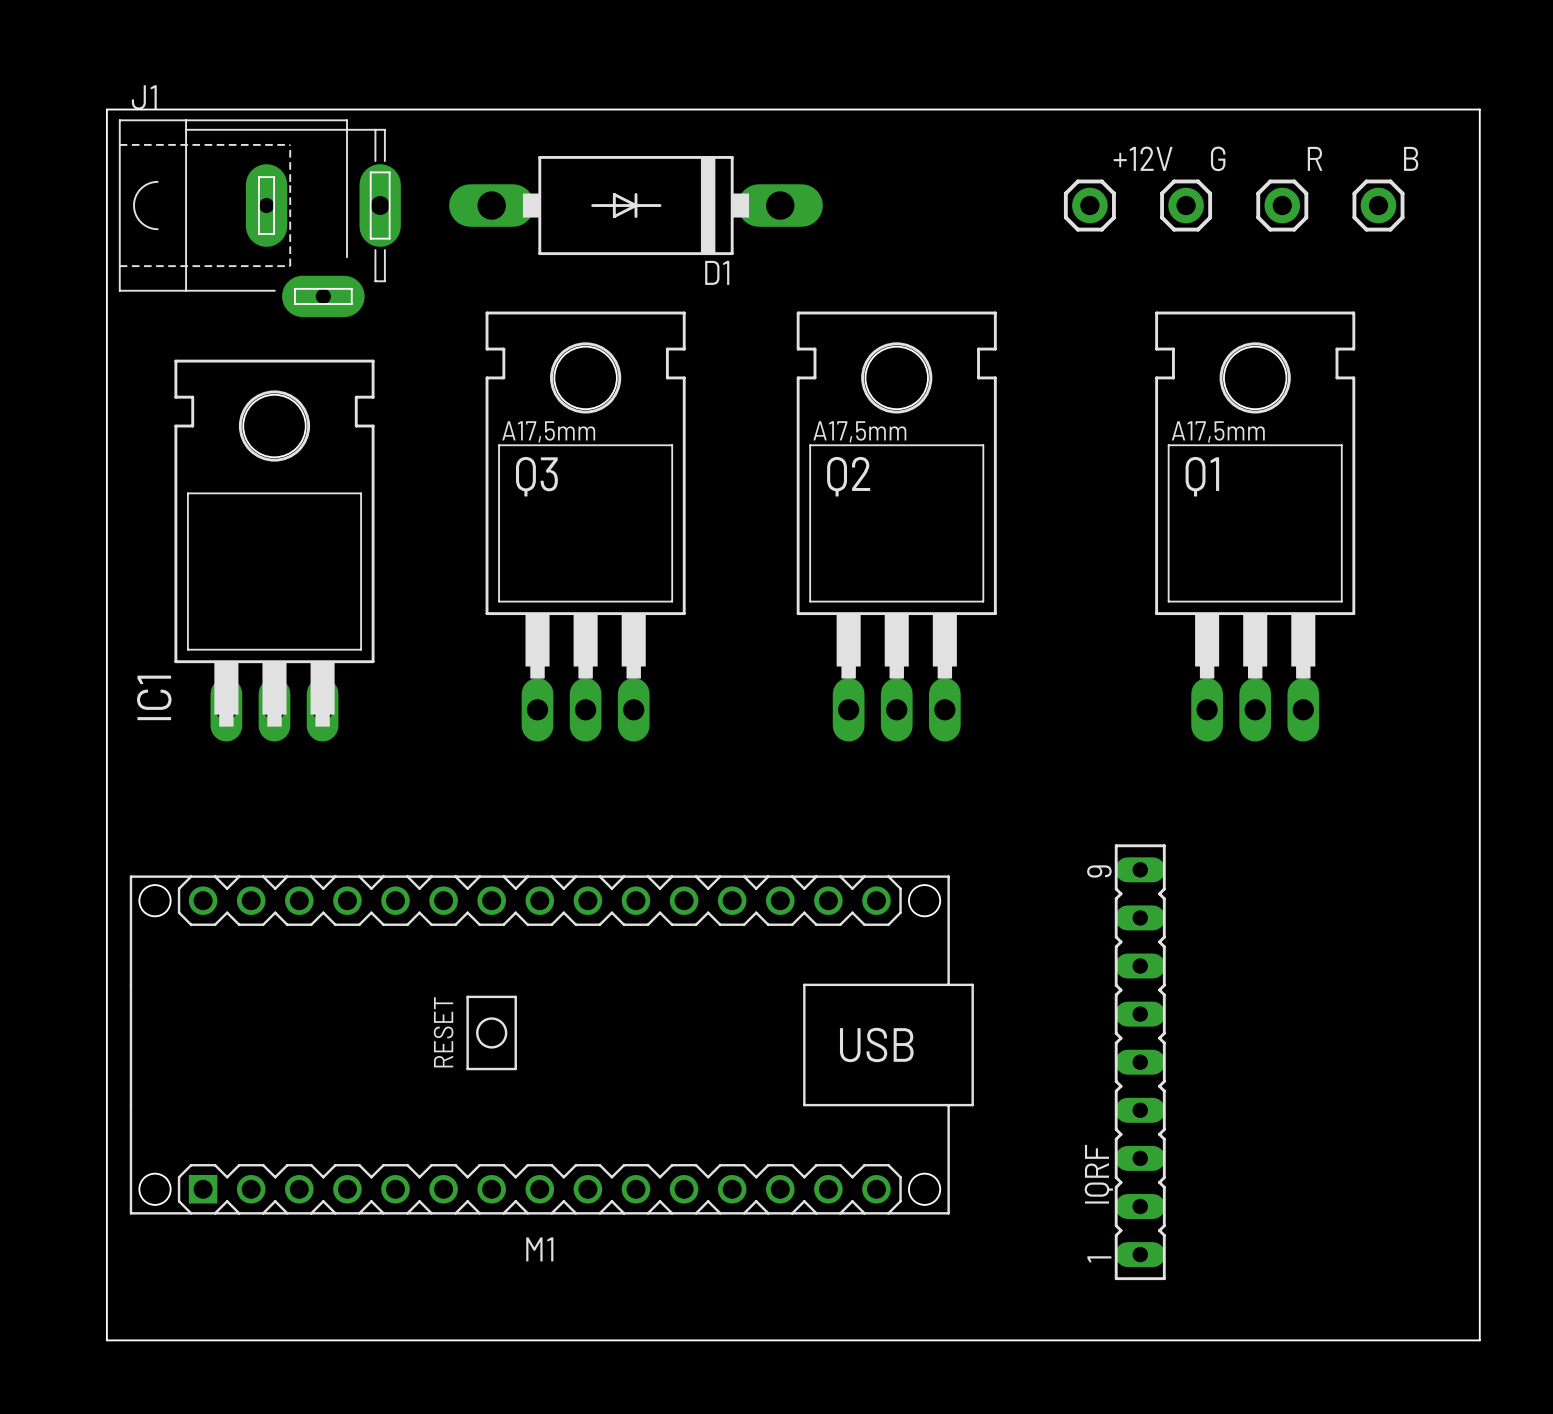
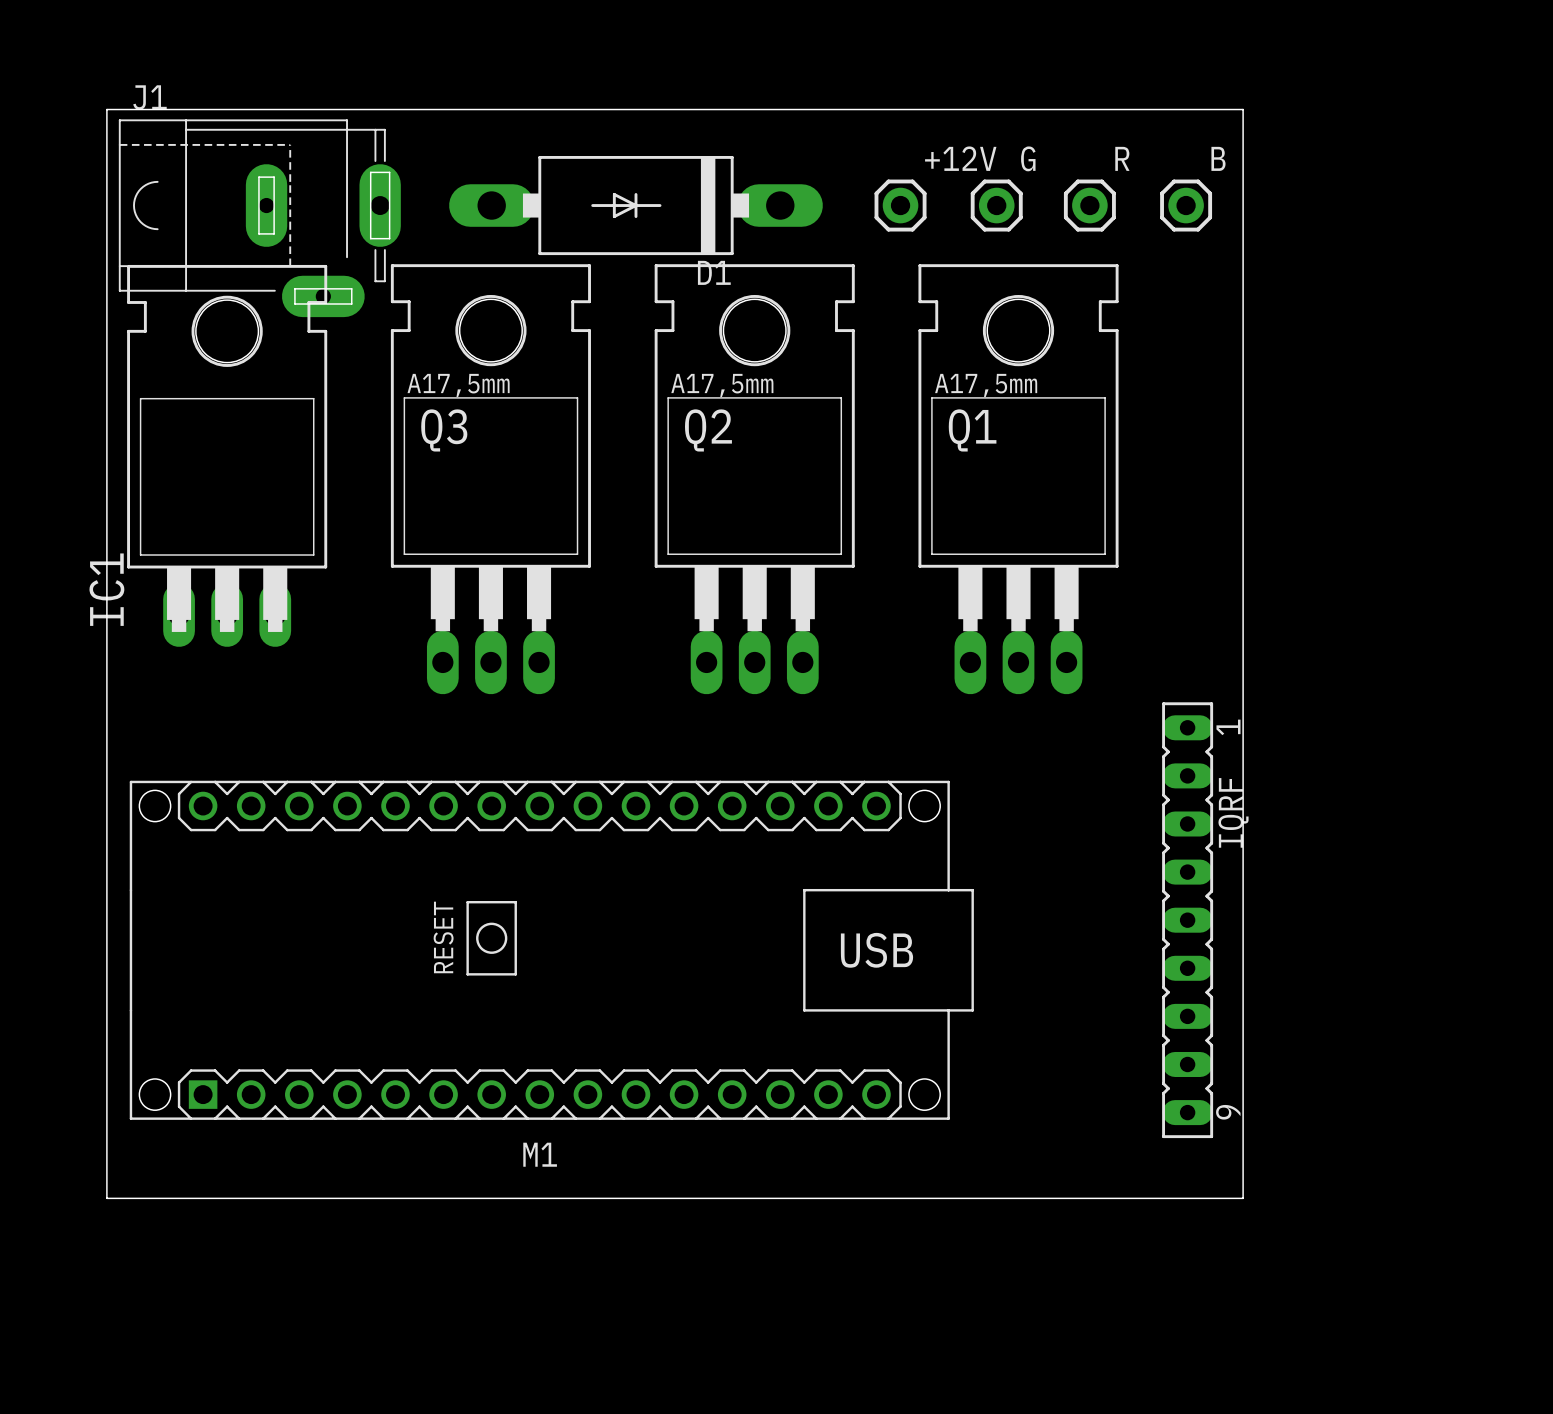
board edge: (1243, 109) (1479, 109) (1479, 1340) (106, 1340) (106, 1198) -> (1243, 109) (1243, 1198) (106, 1198)
+12V name: +12V (1143, 158) -> R (1122, 158)
G name: G (1218, 158) -> B (1218, 158)
+12V: none -> (900, 205)
G: none -> (996, 205)
R: (1282, 205) -> none
B: (1378, 205) -> none
Q3 position: (585, 526) -> (490, 479)
Q2 position: (896, 526) -> (754, 479)
Q1 position: (1255, 526) -> (1018, 479)
IC1 position: (274, 550) -> (227, 455)
IQRF: none -> (1187, 920)
M1 position: (551, 1044) -> (551, 950)
IQRF: (1140, 1062) -> none

